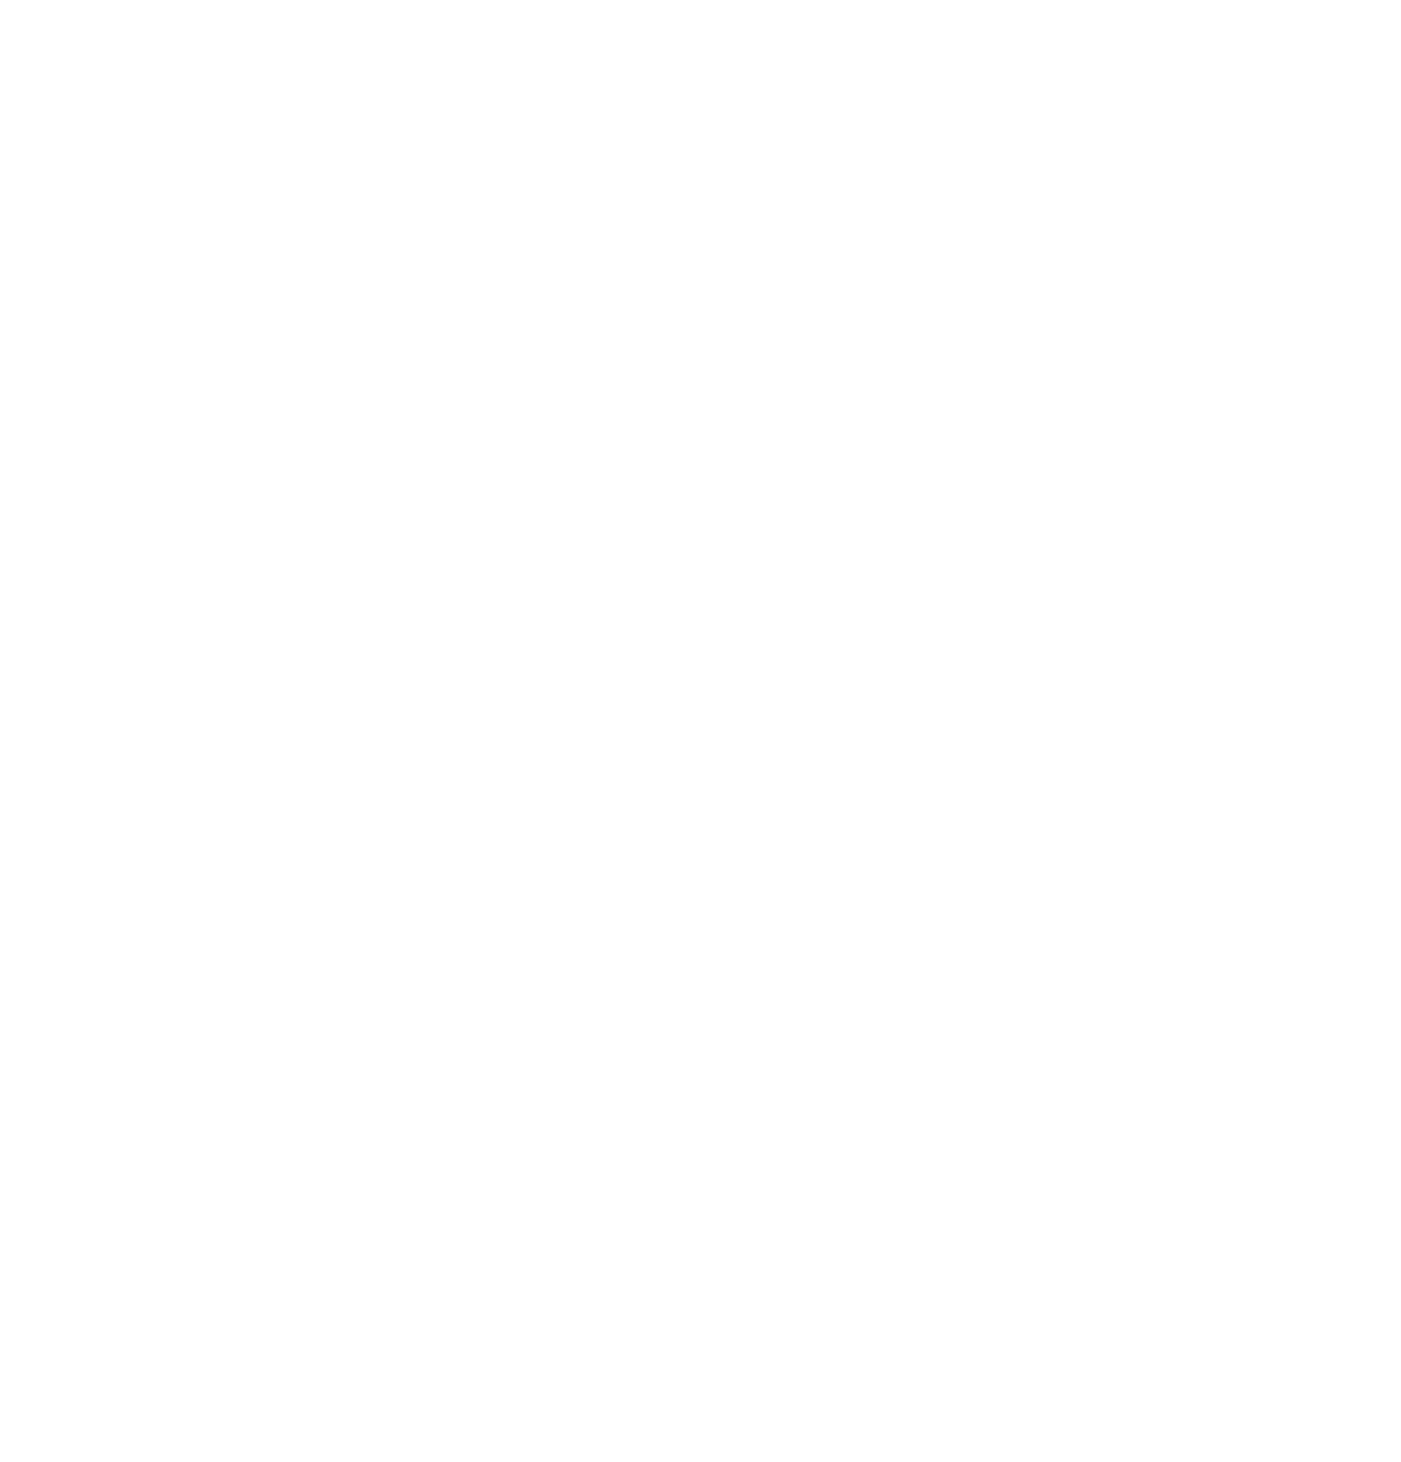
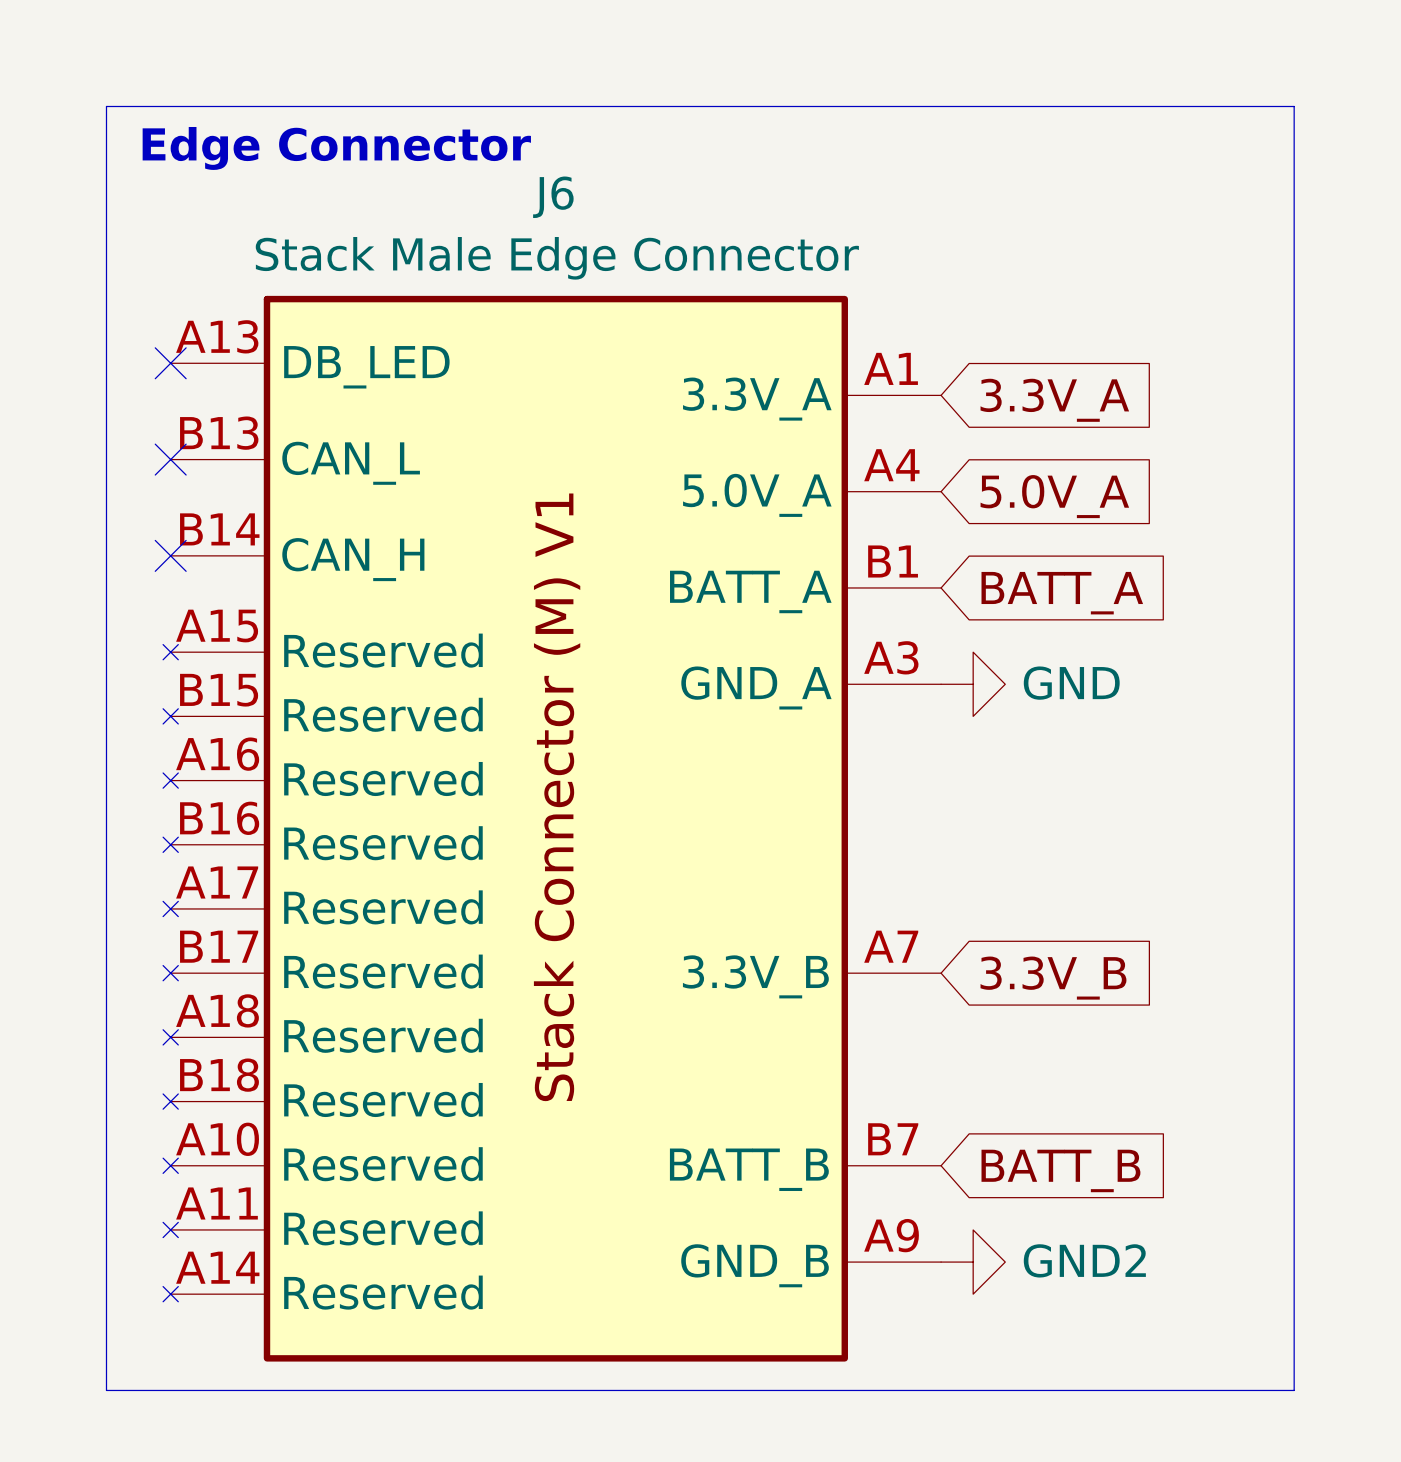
line: none -> (106, 106) (1294, 106) (1294, 1390) (106, 1390) (106, 106)
text: none -> Edge Connector (336, 148)
no-connect mark: none -> (170, 363)
global label: none -> 3.3V_A (1054, 400)
no-connect mark: none -> (170, 459)
global label: none -> 5.0V_A (1054, 496)
no-connect mark: none -> (170, 555)
global label: none -> BATT_A (1062, 593)
power symbol: none -> GND (973, 684)
J6: none -> Stack Male Edge Connector (552, 828)
global label: none -> 3.3V_B (1053, 978)
global label: none -> BATT_B (1060, 1170)
power symbol: none -> GND2 (973, 1262)

